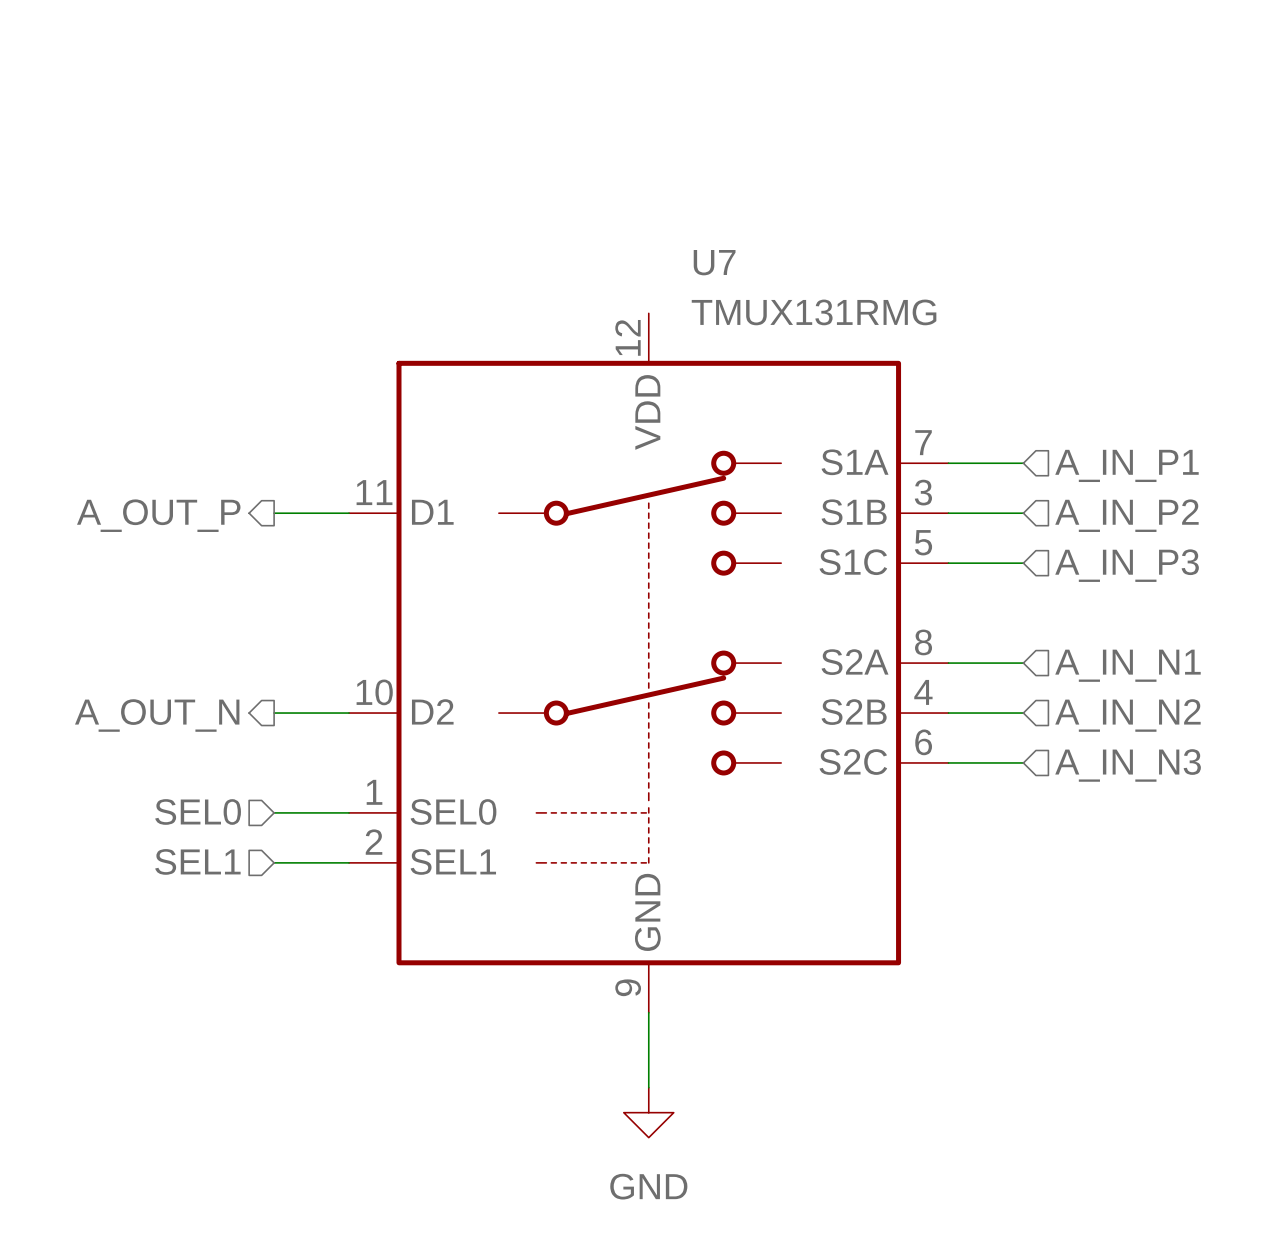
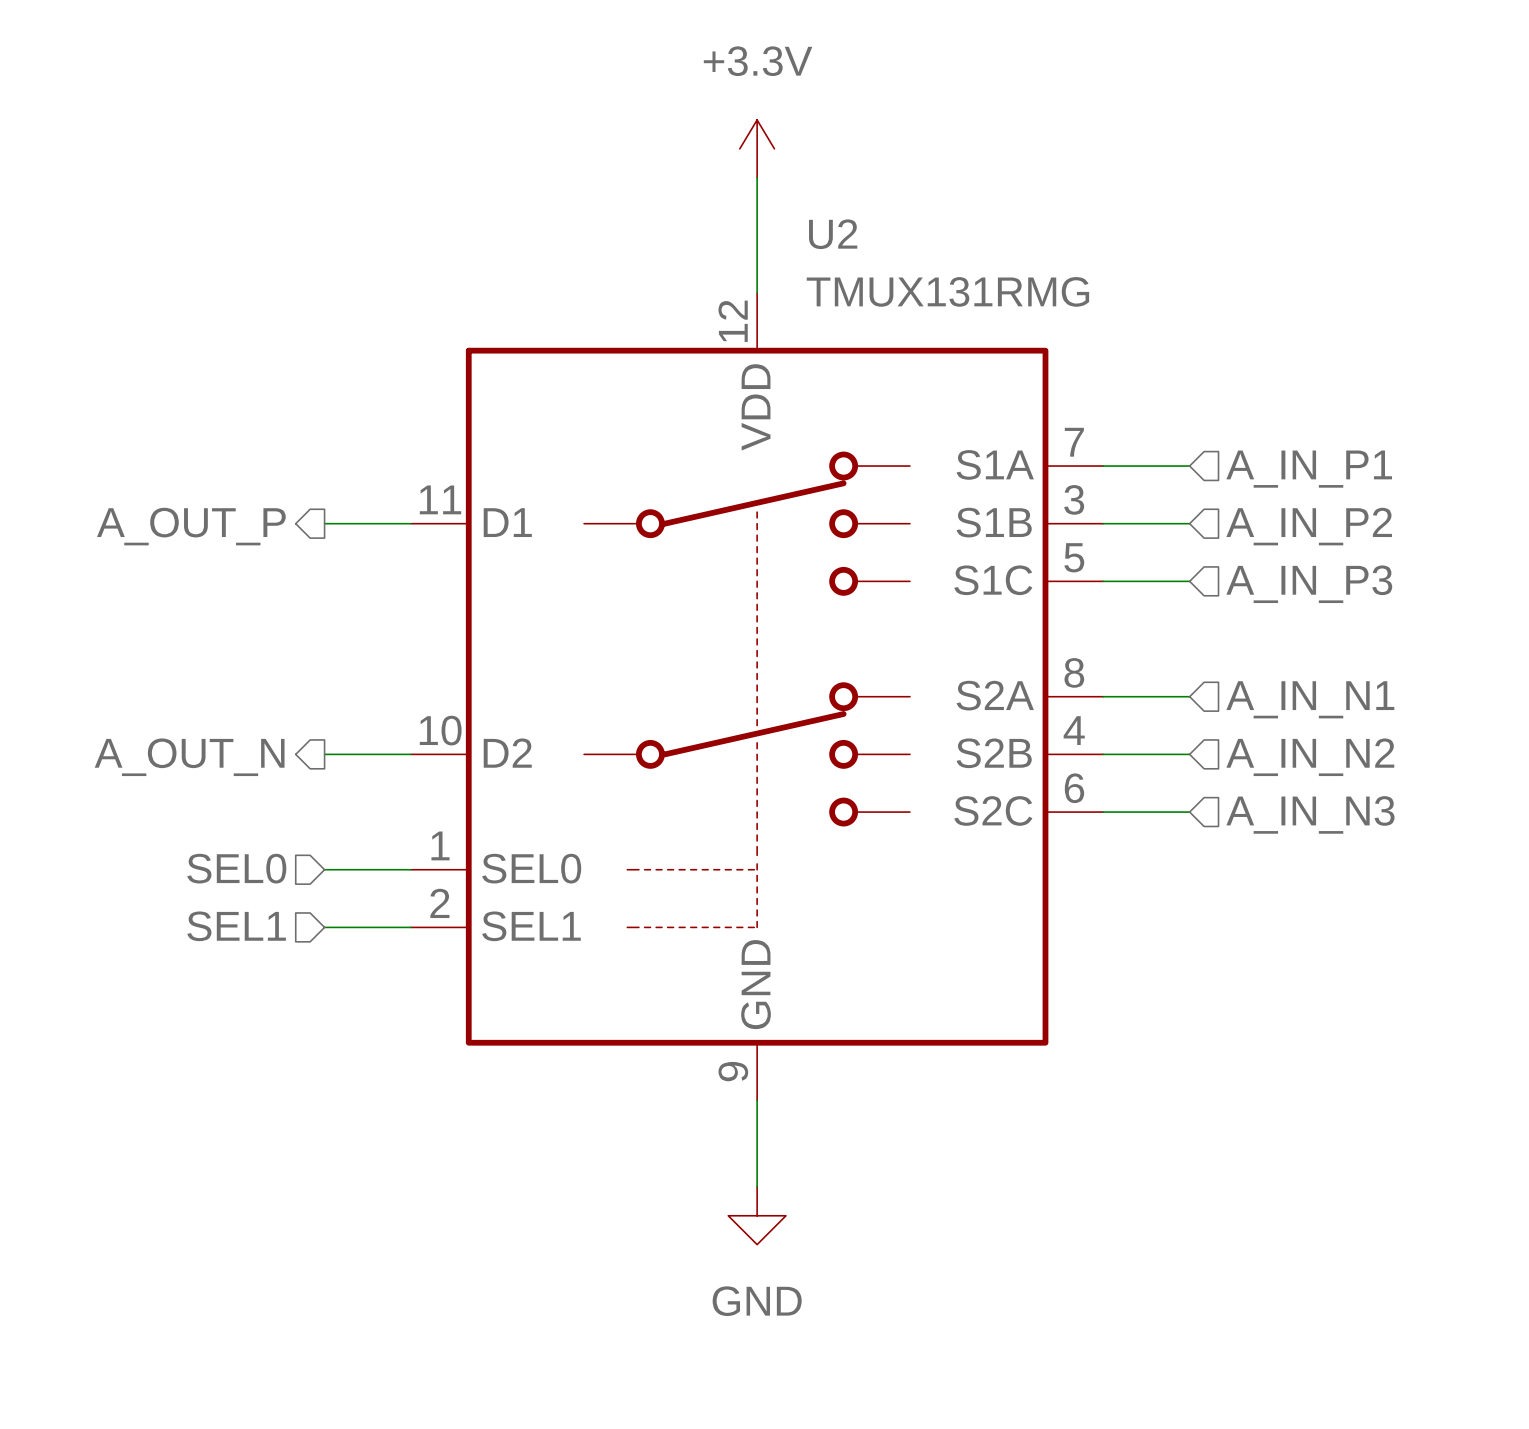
power symbol: none -> +3.3V (757, 148)
wire: none -> (757, 177) (757, 292)
U7 name: U7 (714, 262) -> U2 (833, 234)

